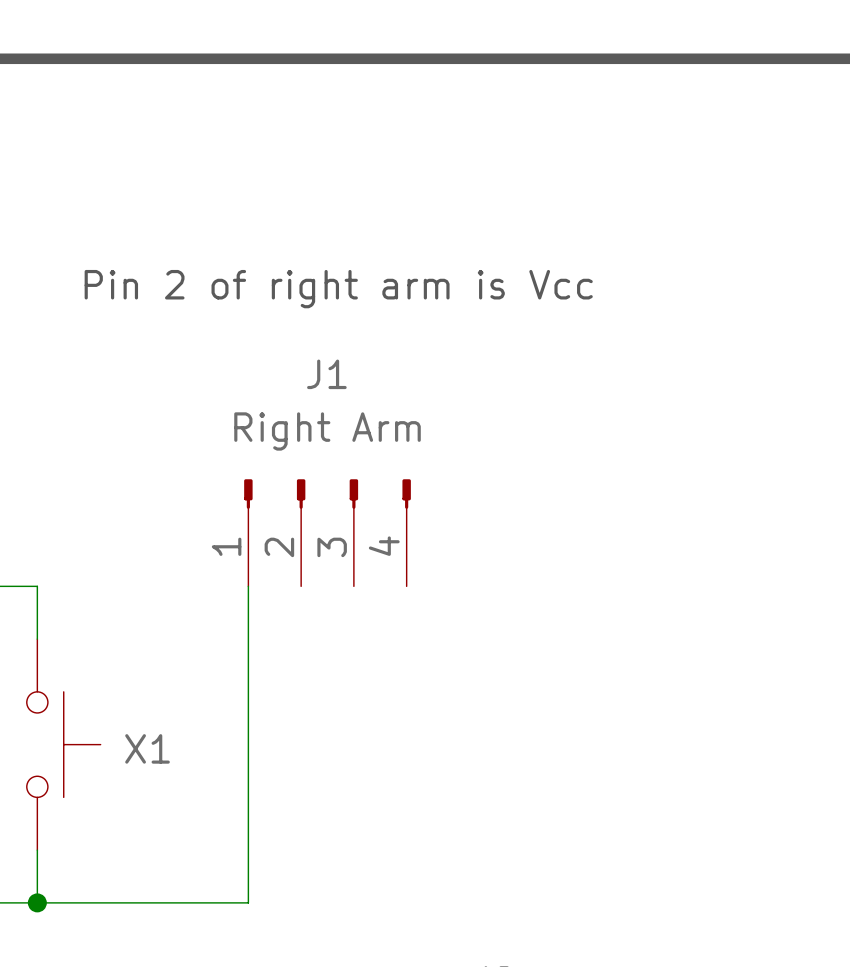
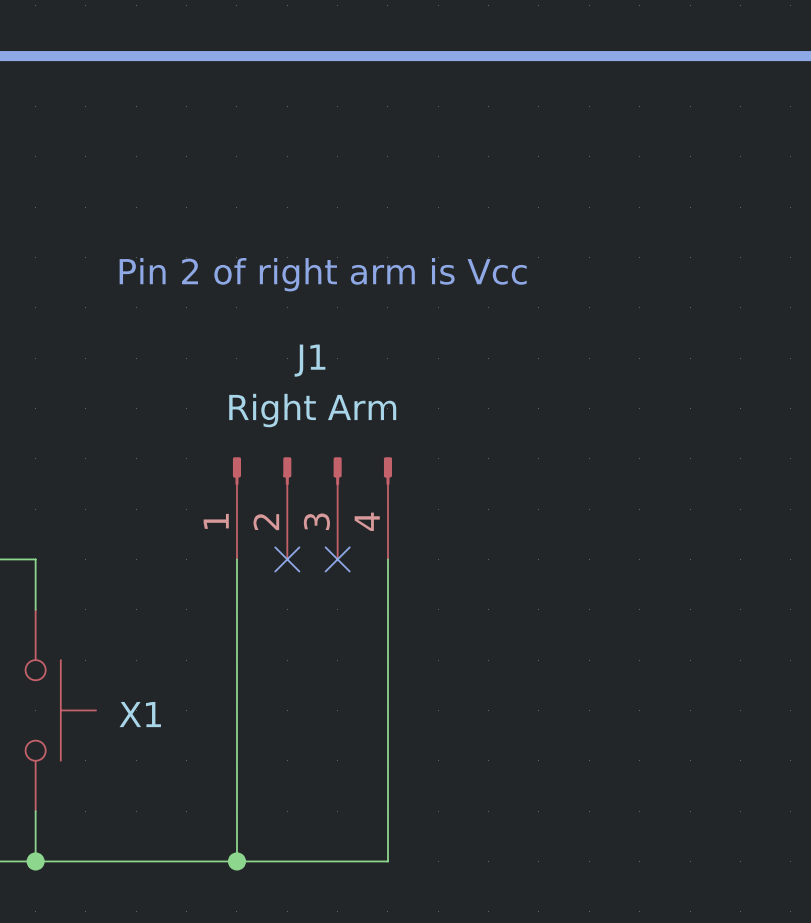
no-connect mark: none -> (287, 559)
no-connect mark: none -> (337, 559)
wire: none -> (387, 559) (387, 861) (236, 861)
junction: none -> (236, 861)

